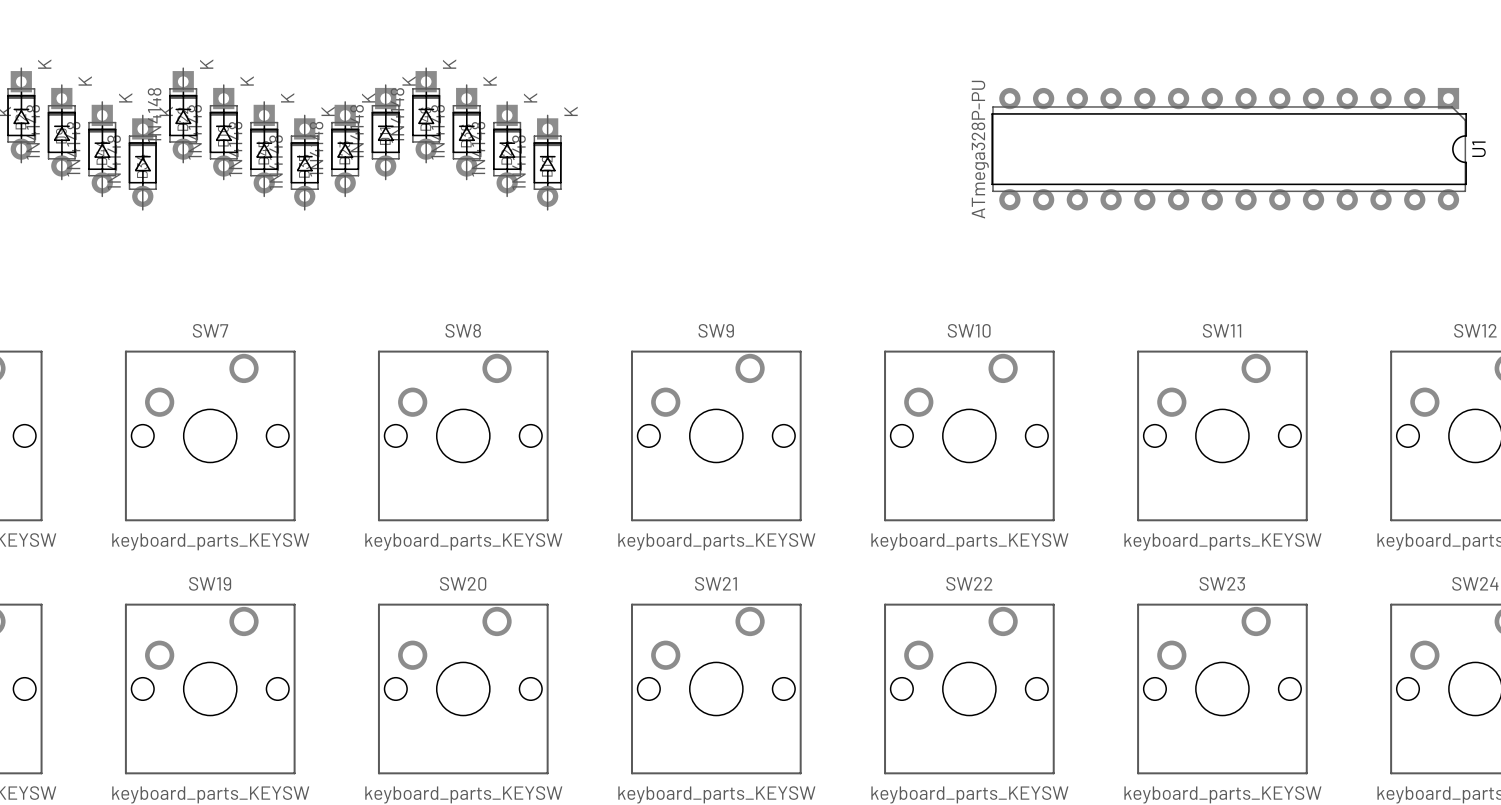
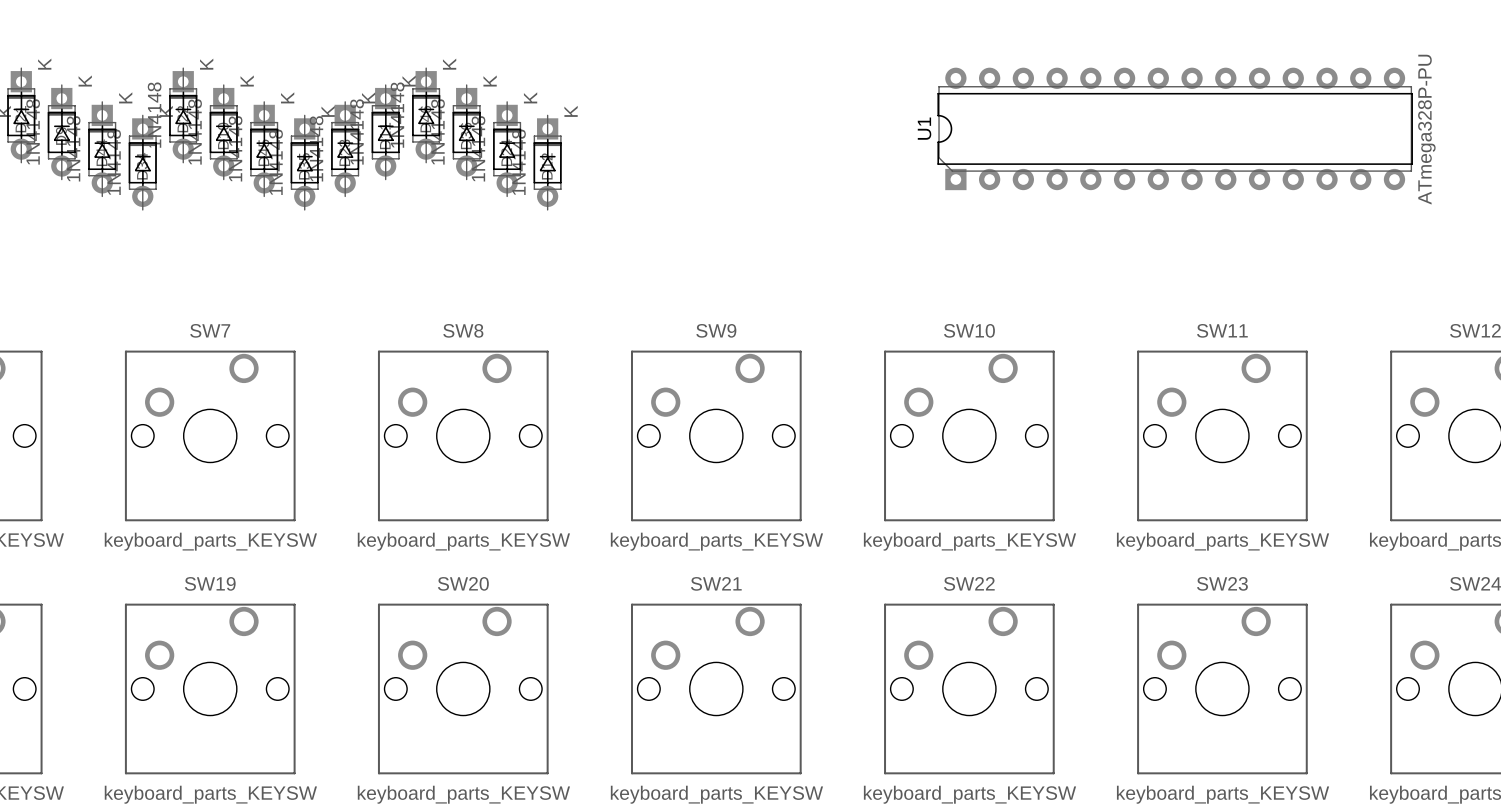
U1 rotation: 0° (1229, 149) -> 180° (1175, 128)

